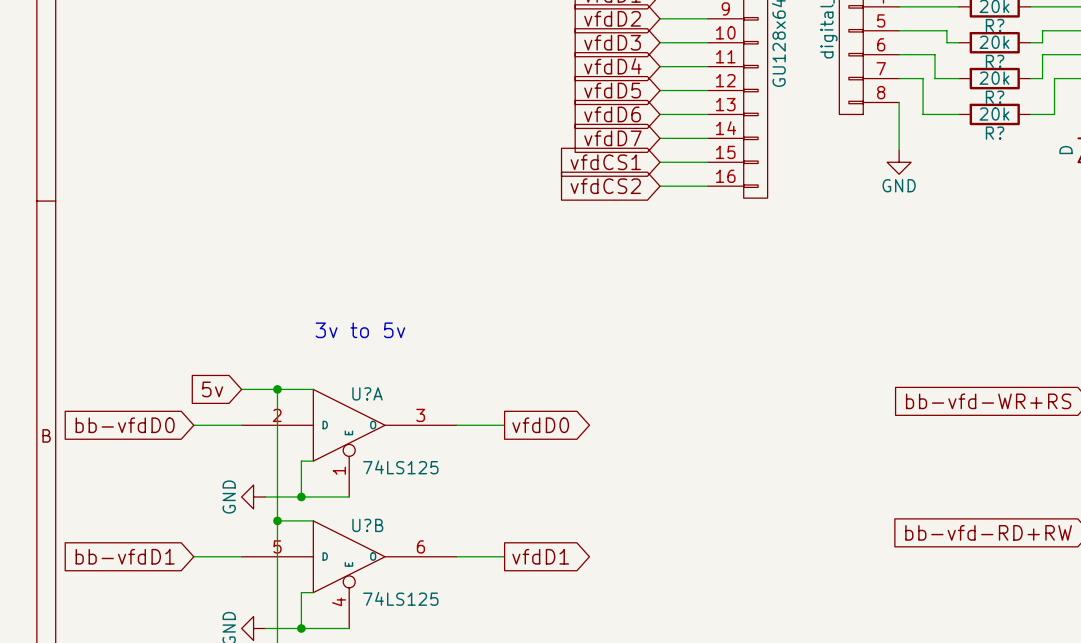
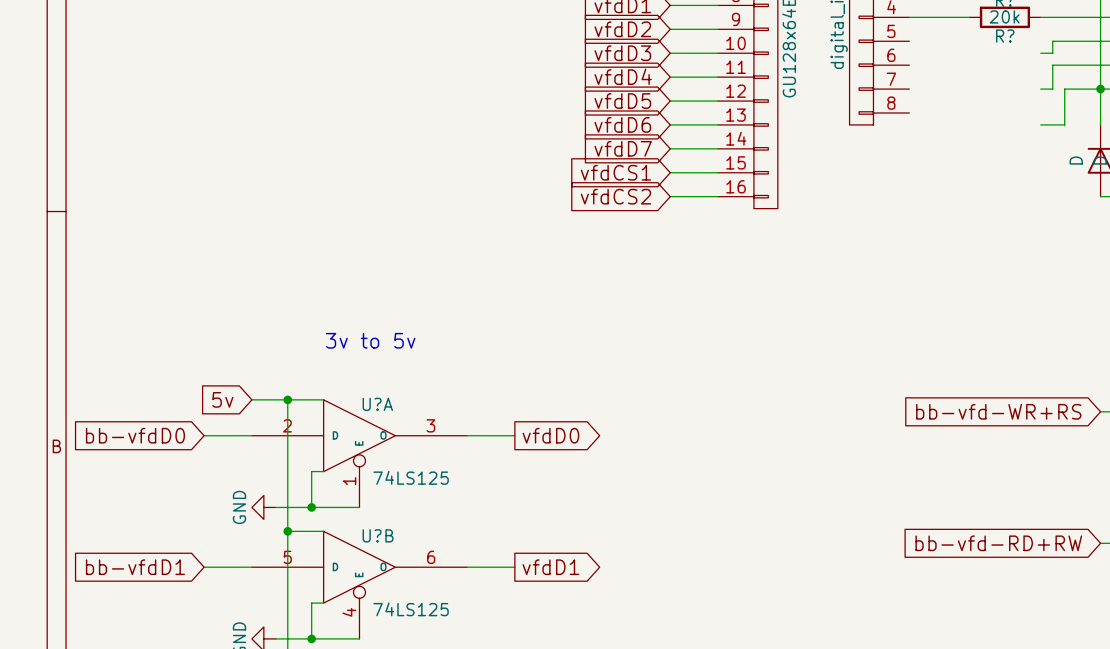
wire: (899, 30) (946, 30) (946, 42) (958, 42) -> none
R?: 20k (994, 42) -> none
wire: (899, 54) (934, 54) (934, 78) (958, 78) -> none
wire: (899, 78) (923, 78) (923, 114) (958, 114) -> none
R?: 20k (994, 78) -> none
wire: (899, 102) (899, 150) -> none
R?: 20k (994, 114) -> none
power symbol: GND (899, 162) -> none

